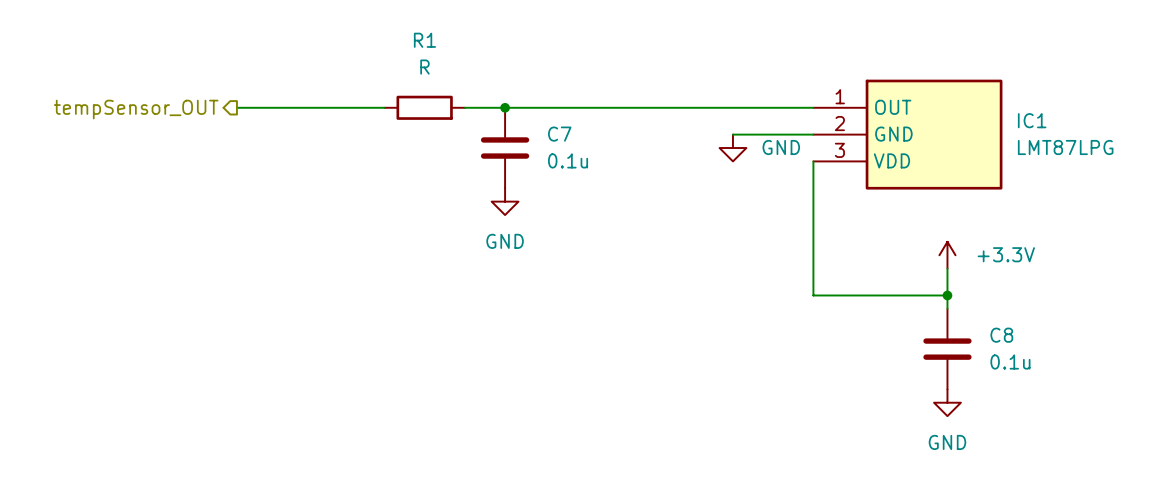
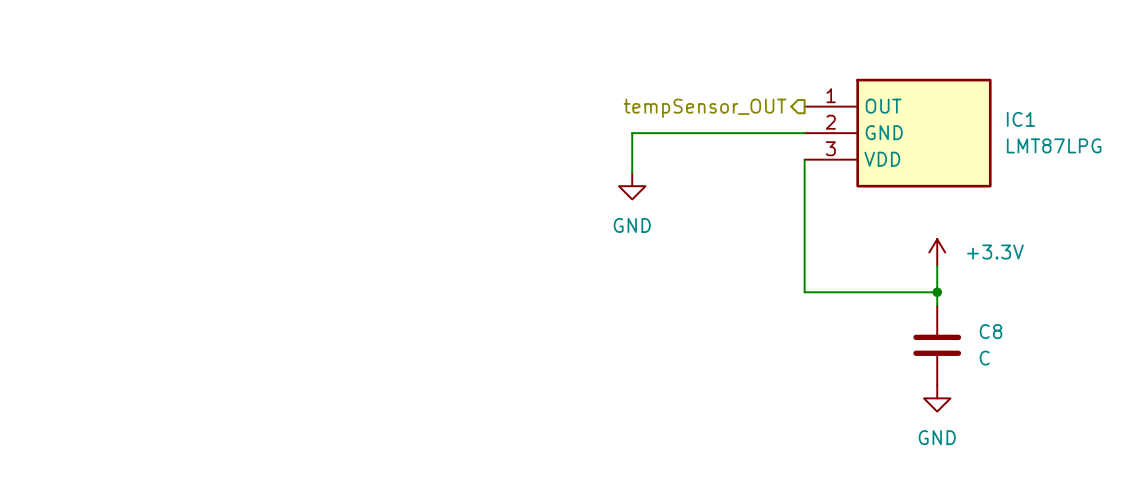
wire: (236, 107) (384, 107) -> none
R1: R (424, 107) -> none
wire: (464, 107) (813, 107) -> none
junction: (505, 107) -> none
hierarchical label: tempSensor_OUT (136, 109) -> none
hierarchical label: none -> tempSensor_OUT (704, 108)
wire: none -> (725, 133) (632, 133) (632, 172)
C7: 0.1u (505, 148) -> none
power symbol: GND (732, 148) -> none
power symbol: none -> GND (632, 186)
power symbol: GND (505, 201) -> none
C8 value: 0.1u (1010, 362) -> C (984, 358)

